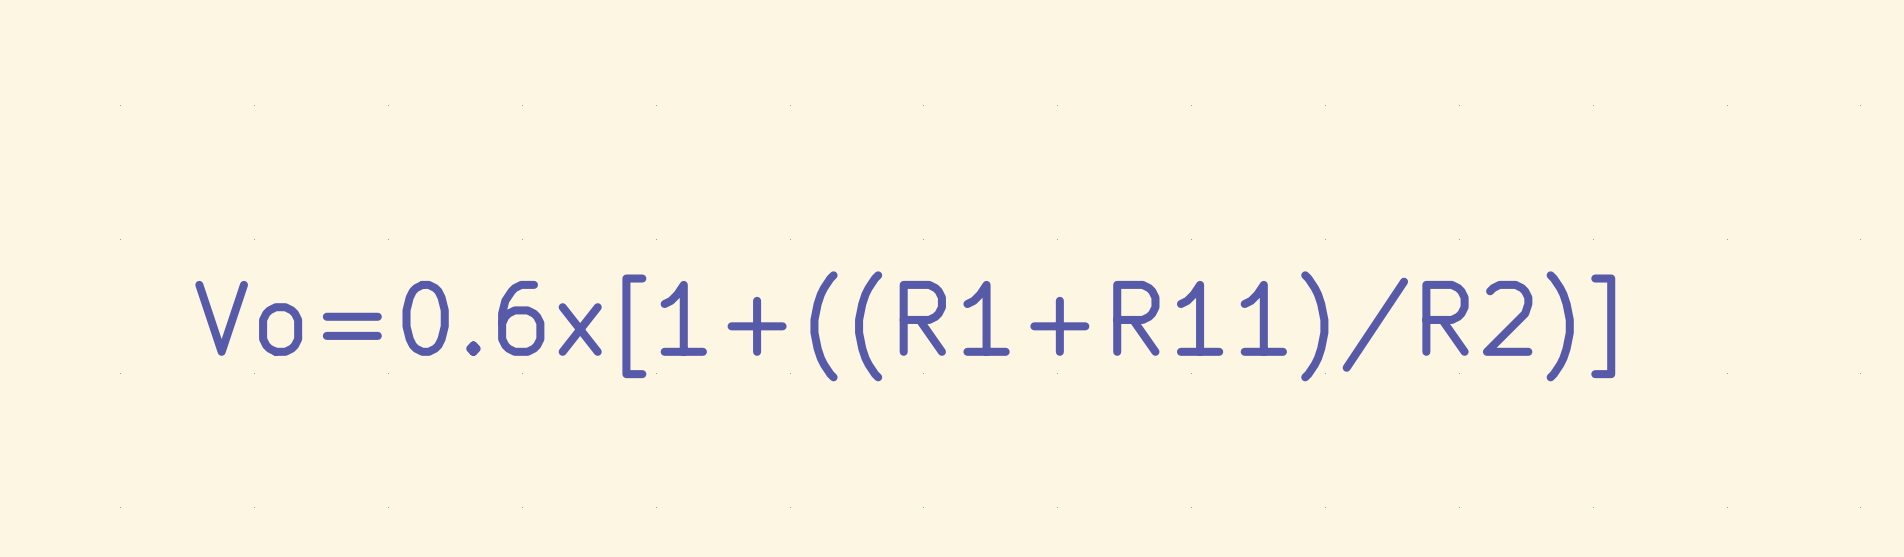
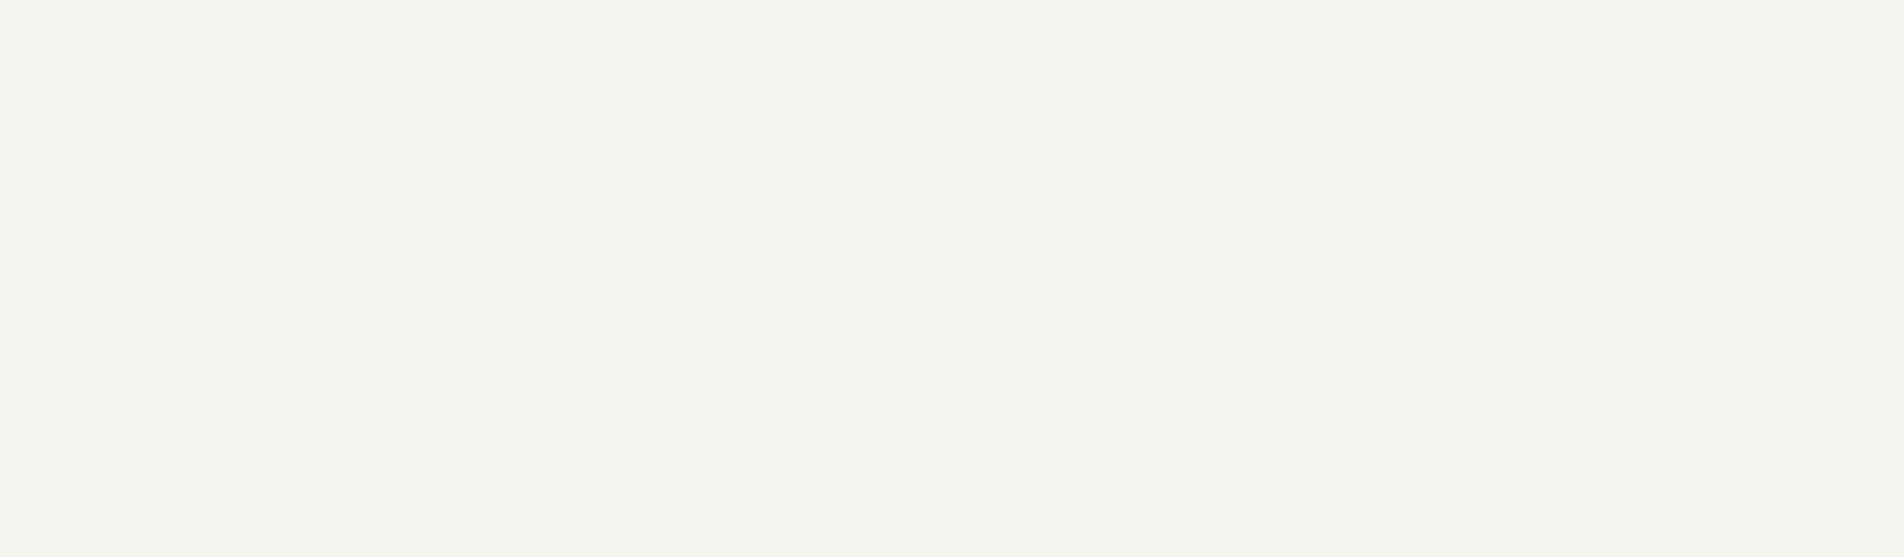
text: Vo=0.6x[1+((R1+R11)/R2)] (905, 326) -> none

